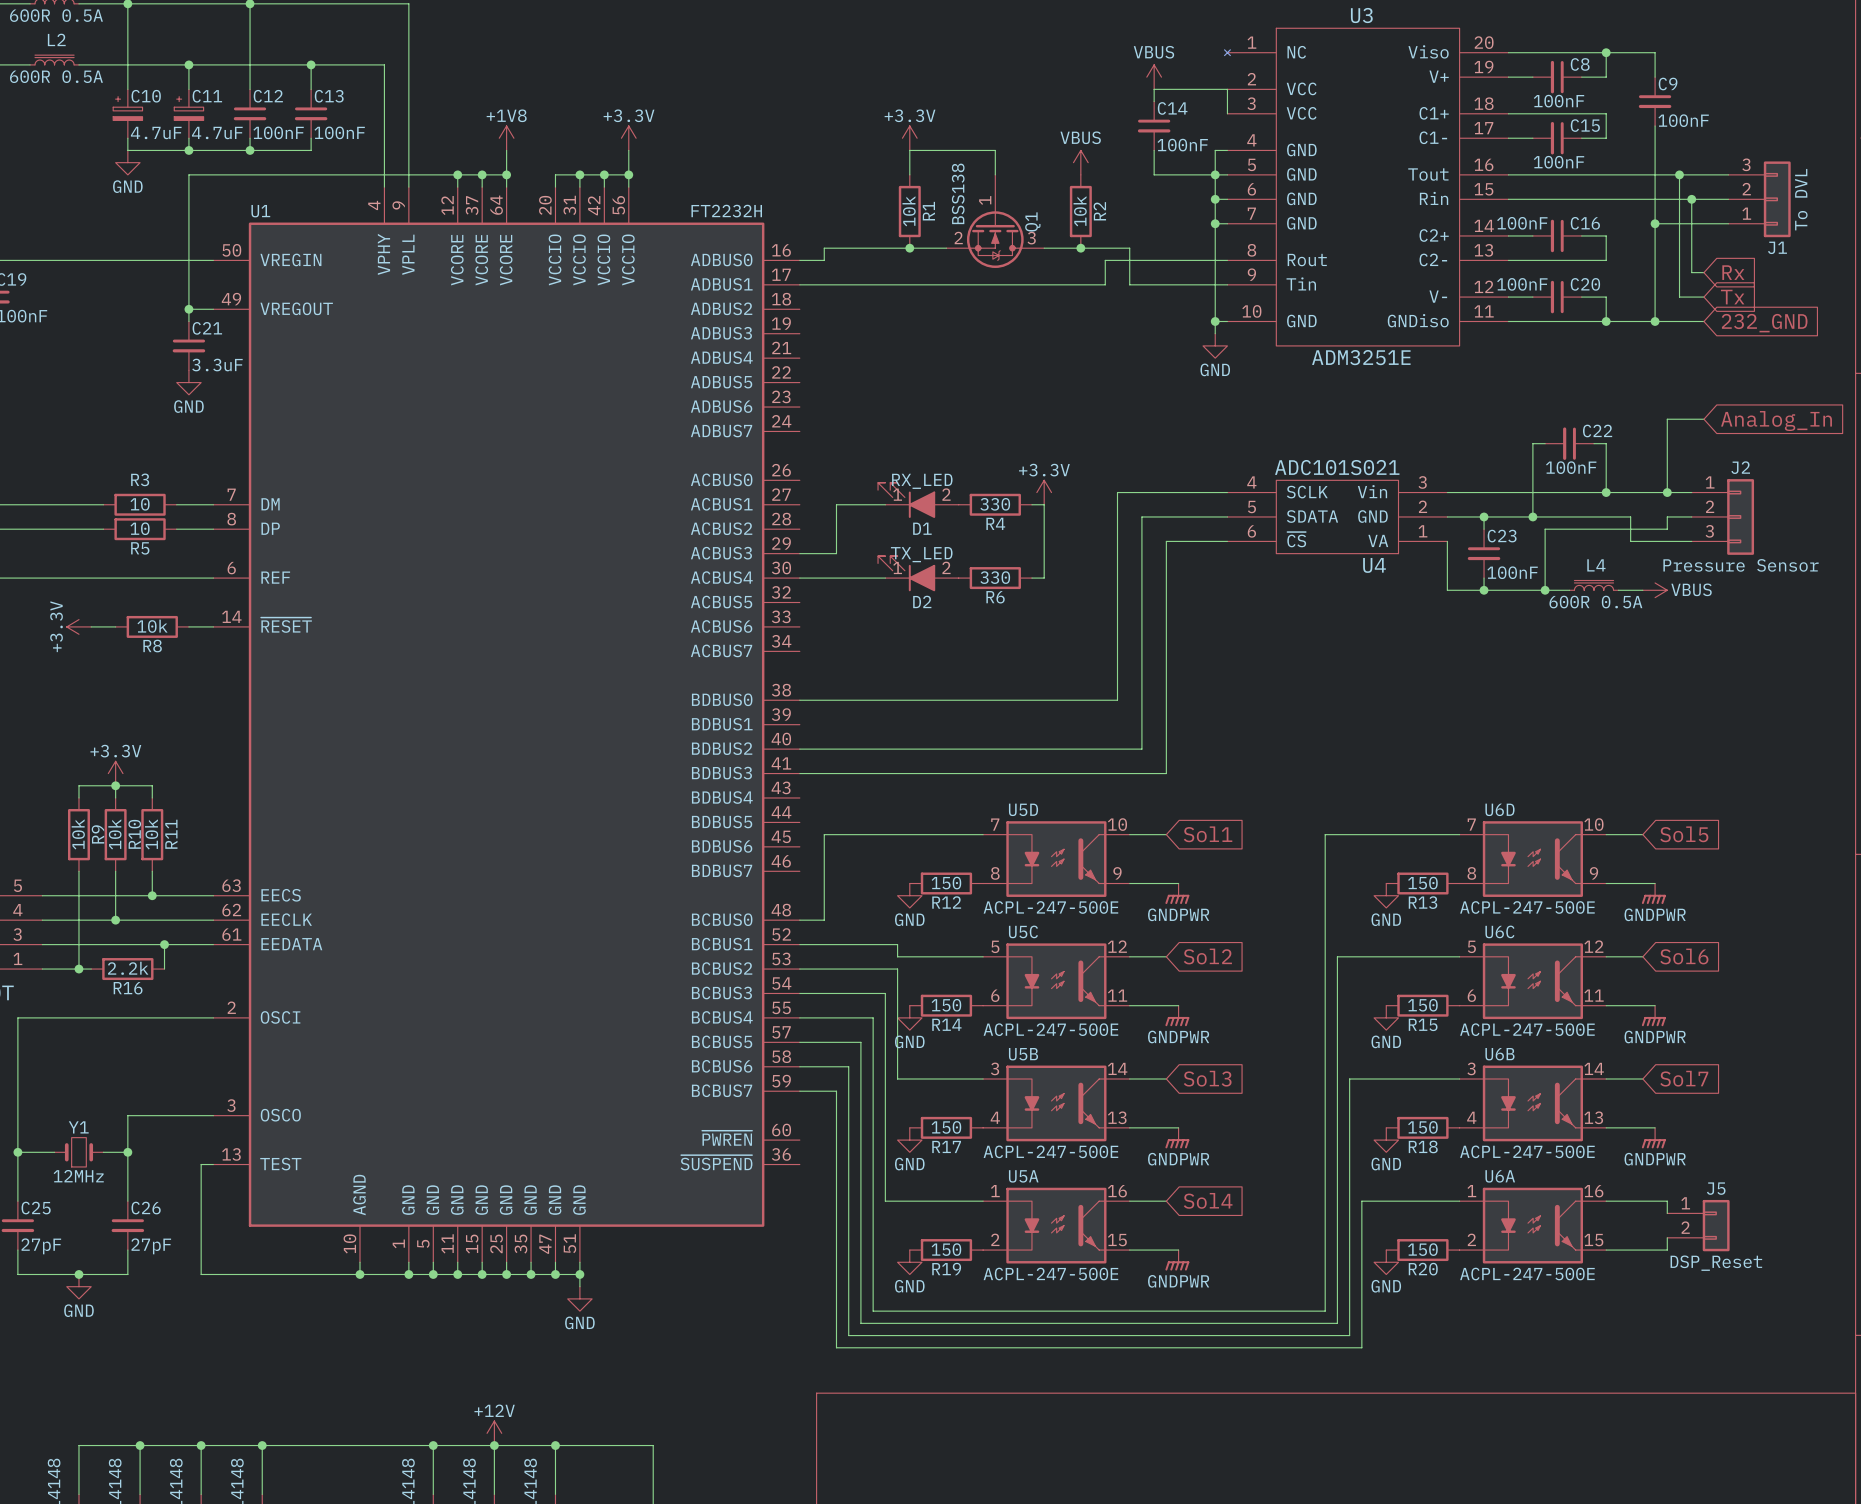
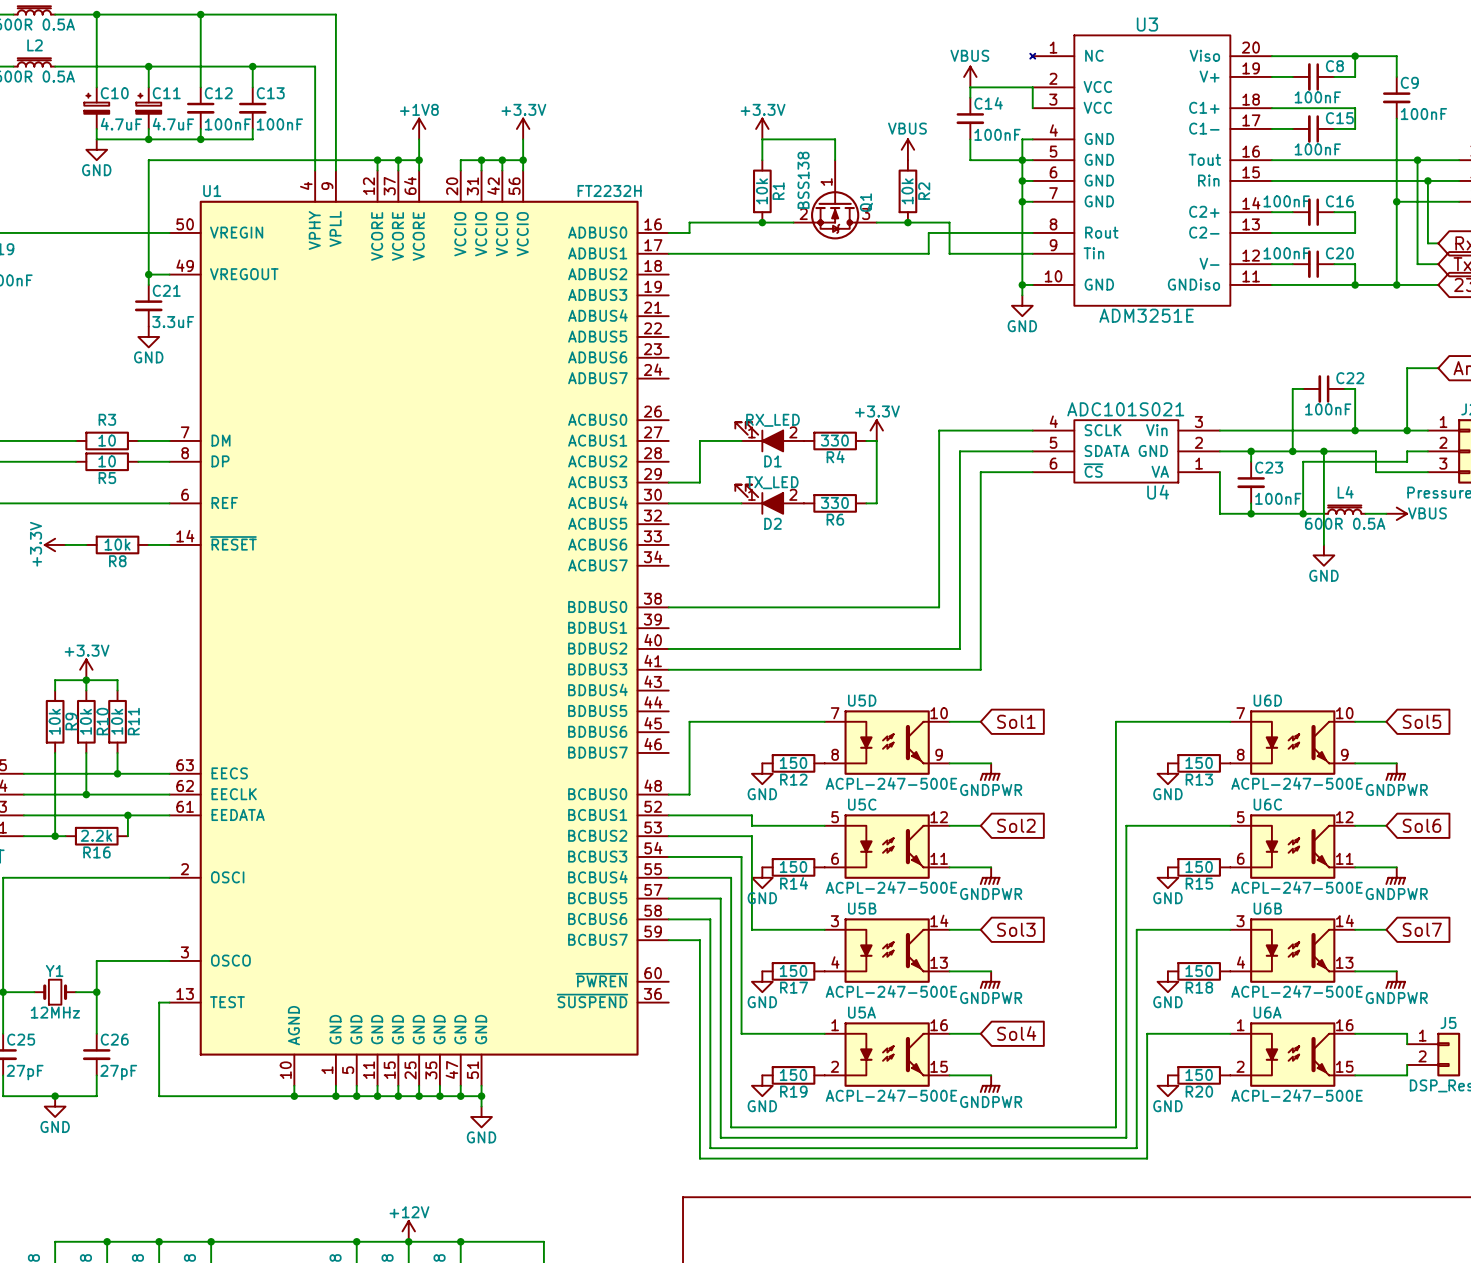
wire: none -> (1323, 451) (1323, 544)
junction: none -> (1323, 451)
power symbol: none -> GND (1323, 555)

